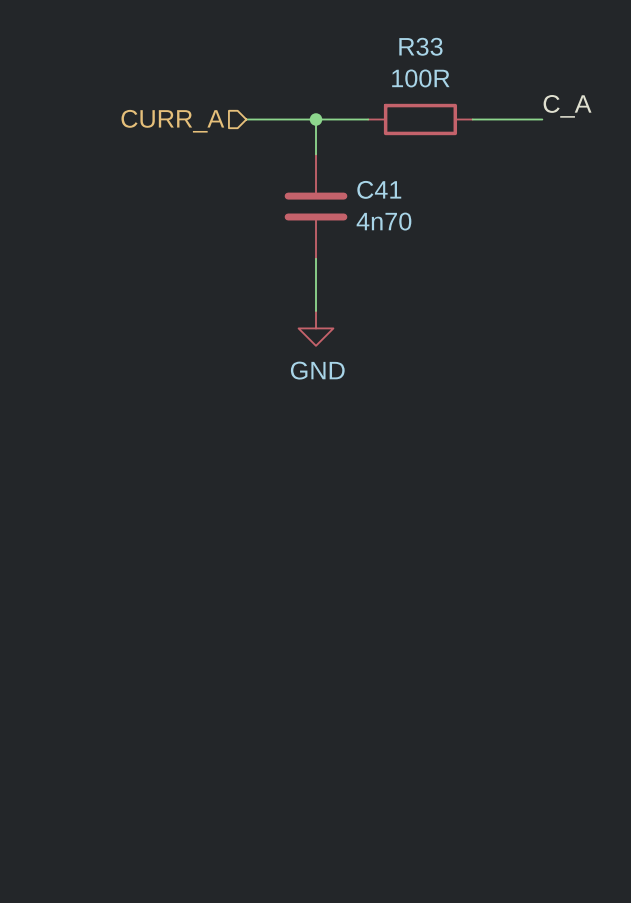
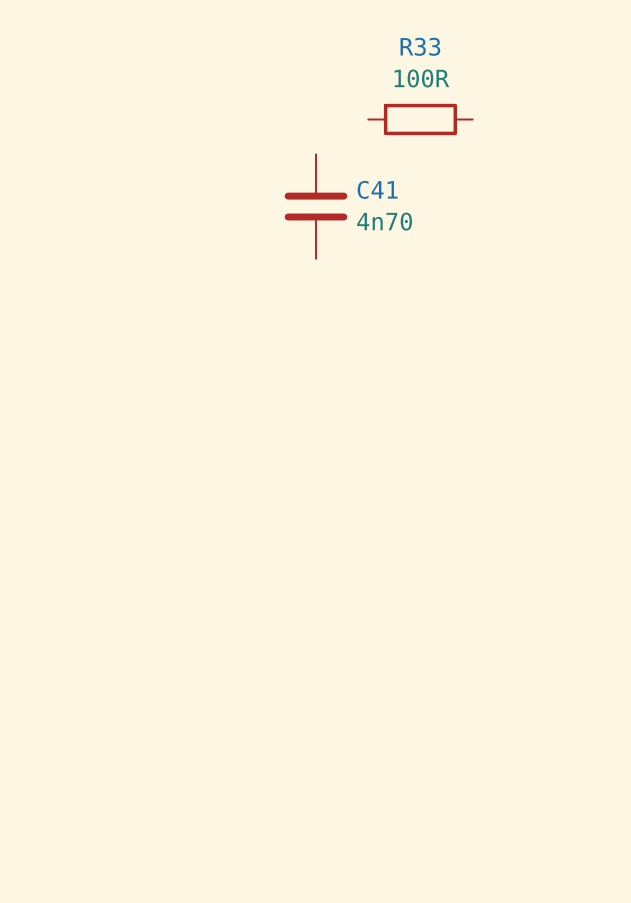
label: C_A (567, 106) -> none
wire: (246, 119) (368, 119) -> none
wire: (316, 119) (316, 154) -> none
junction: (316, 119) -> none
wire: (472, 119) (542, 119) -> none
hierarchical label: CURR_A (172, 121) -> none
wire: (316, 258) (316, 311) -> none
power symbol: GND (316, 328) -> none

